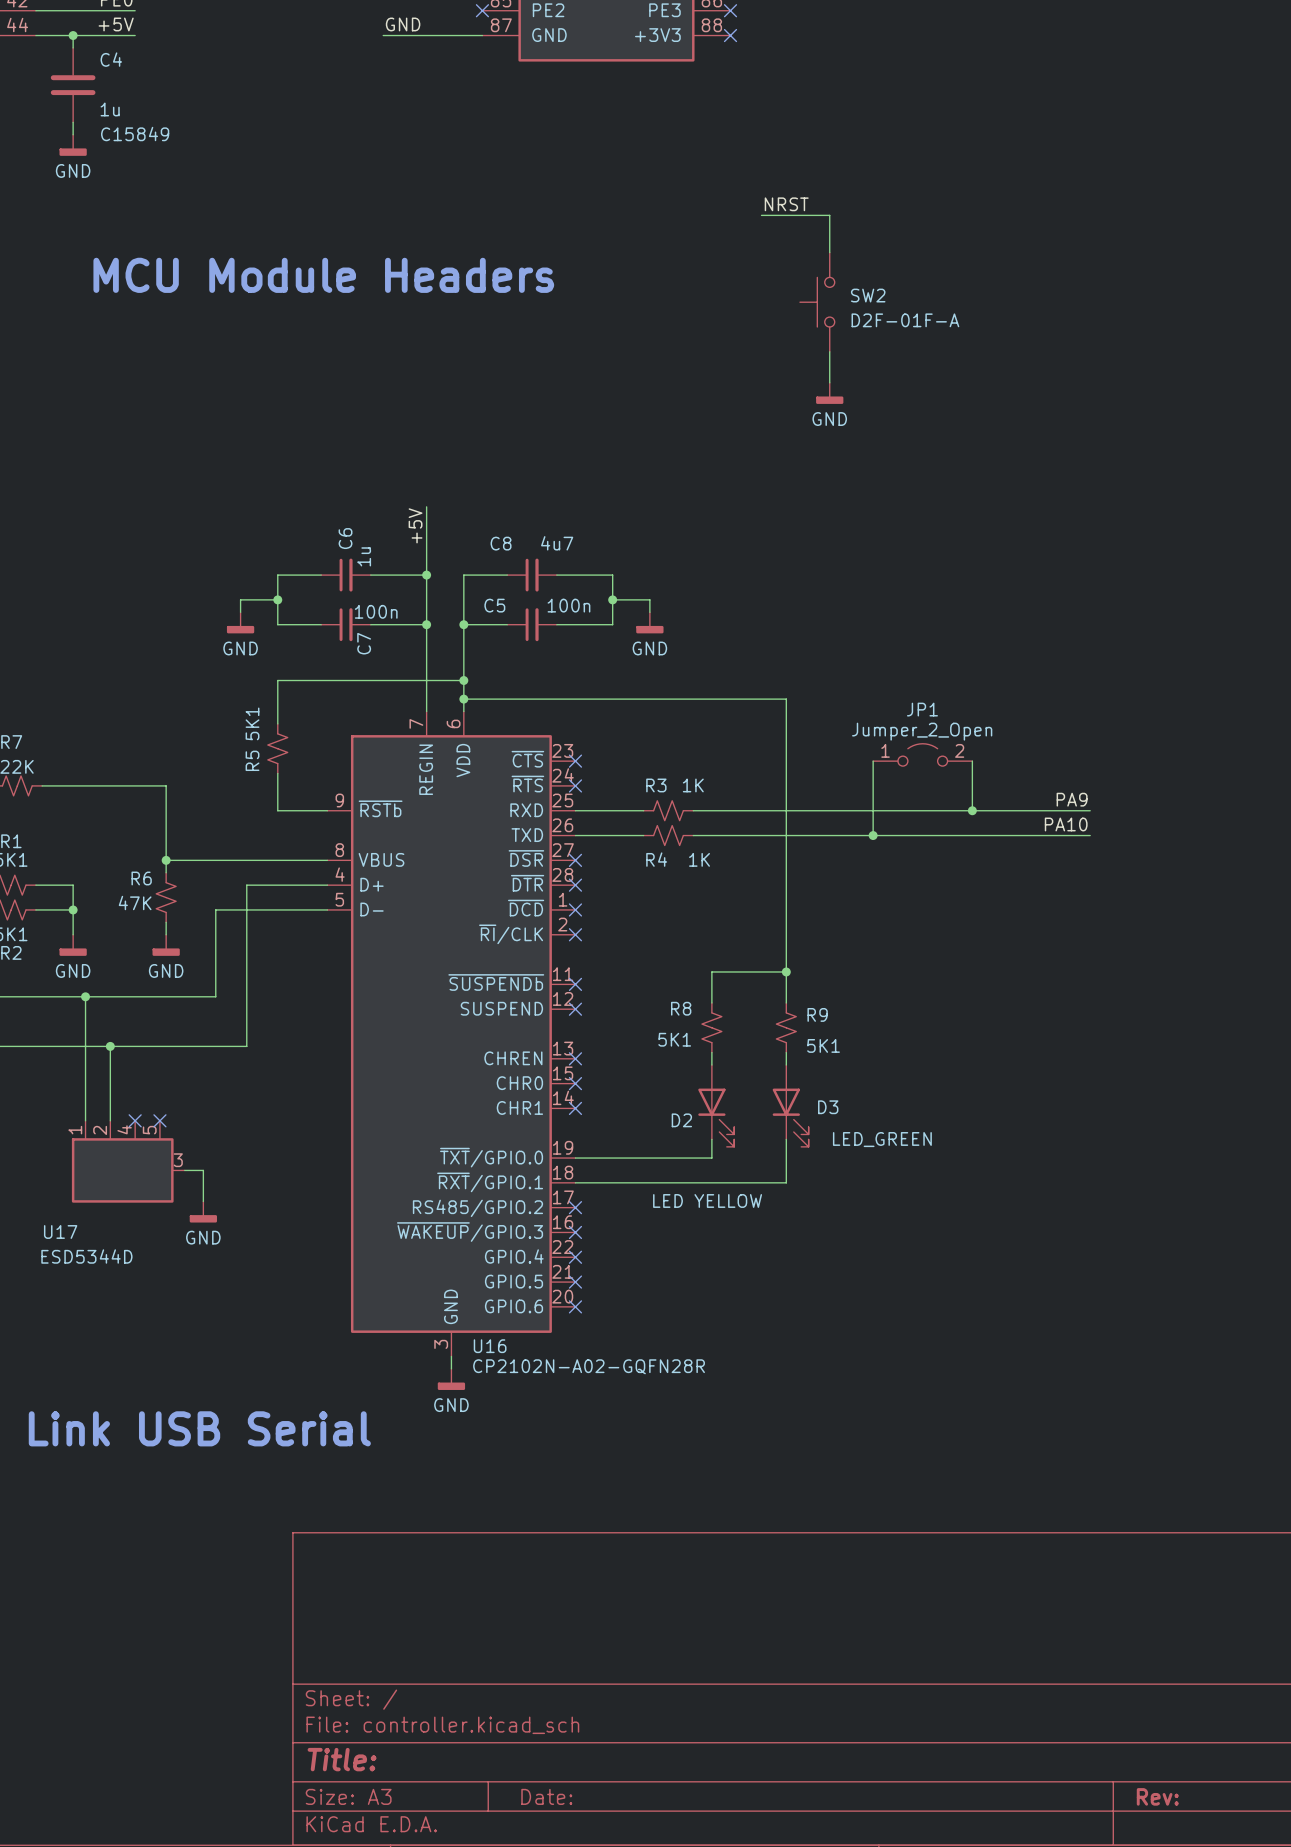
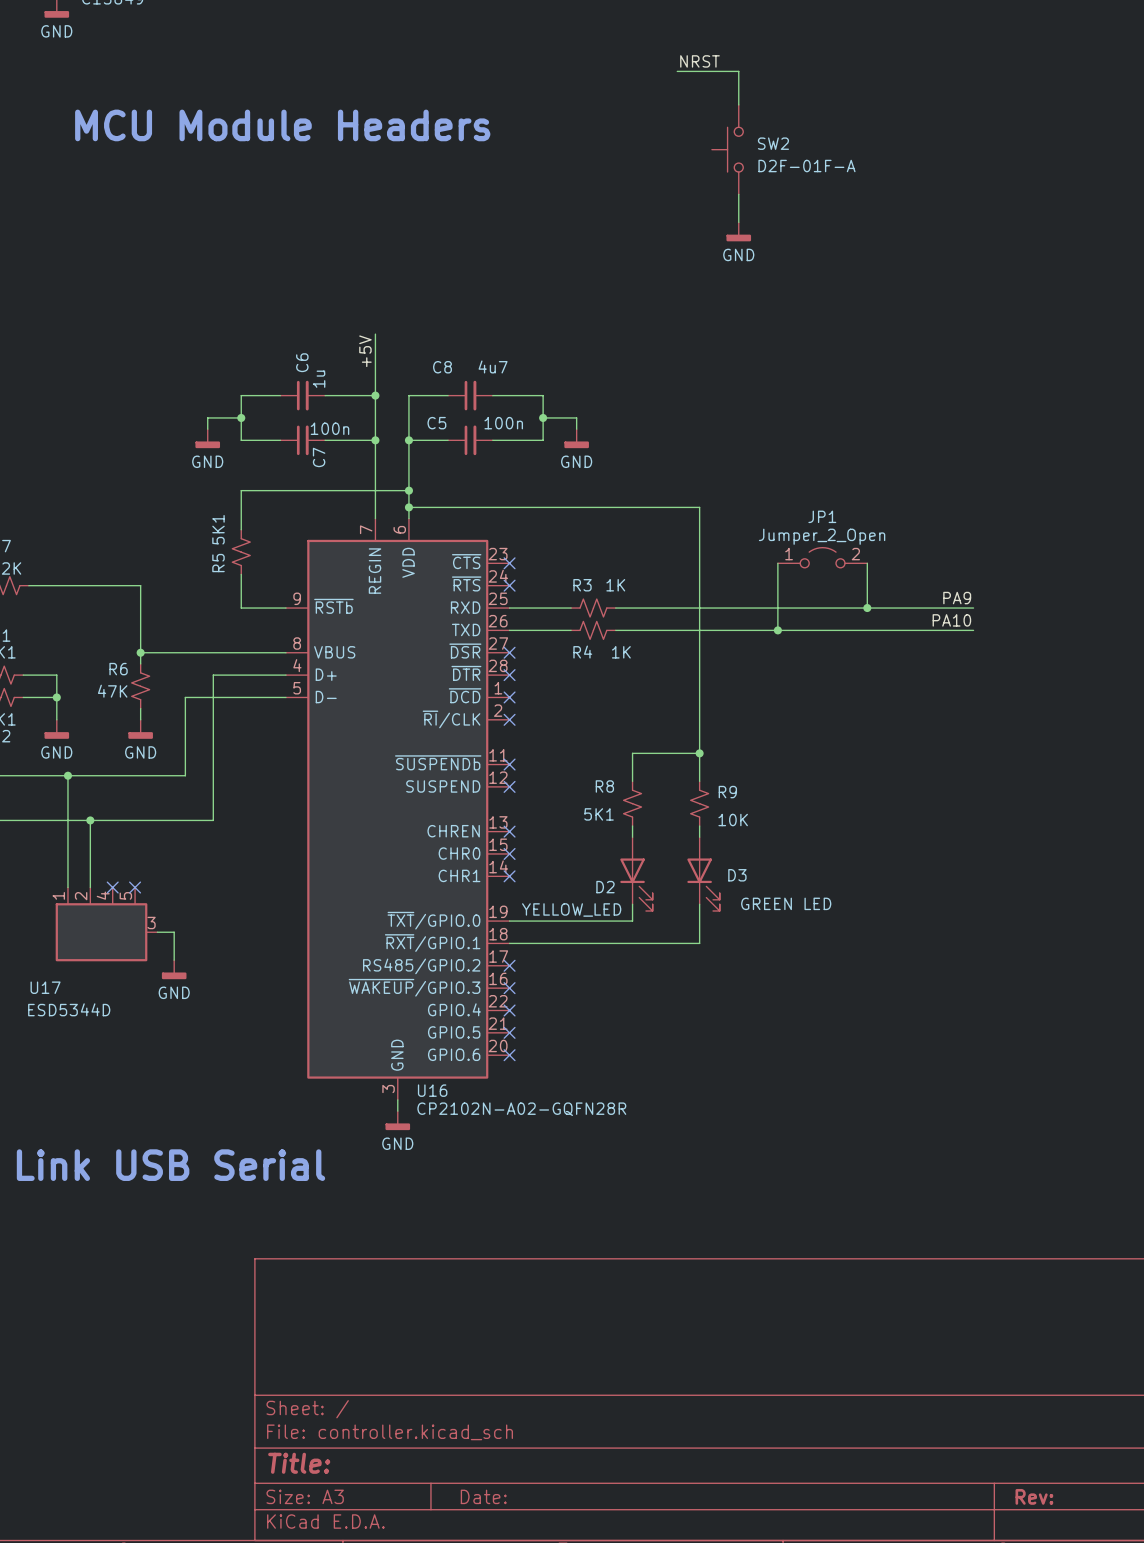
R9 value: 5K1 (823, 1045) -> 10K (733, 820)
D3 value: LED_GREEN (882, 1139) -> GREEN LED (786, 903)
D2 value: LED YELLOW (707, 1200) -> YELLOW_LED (571, 909)

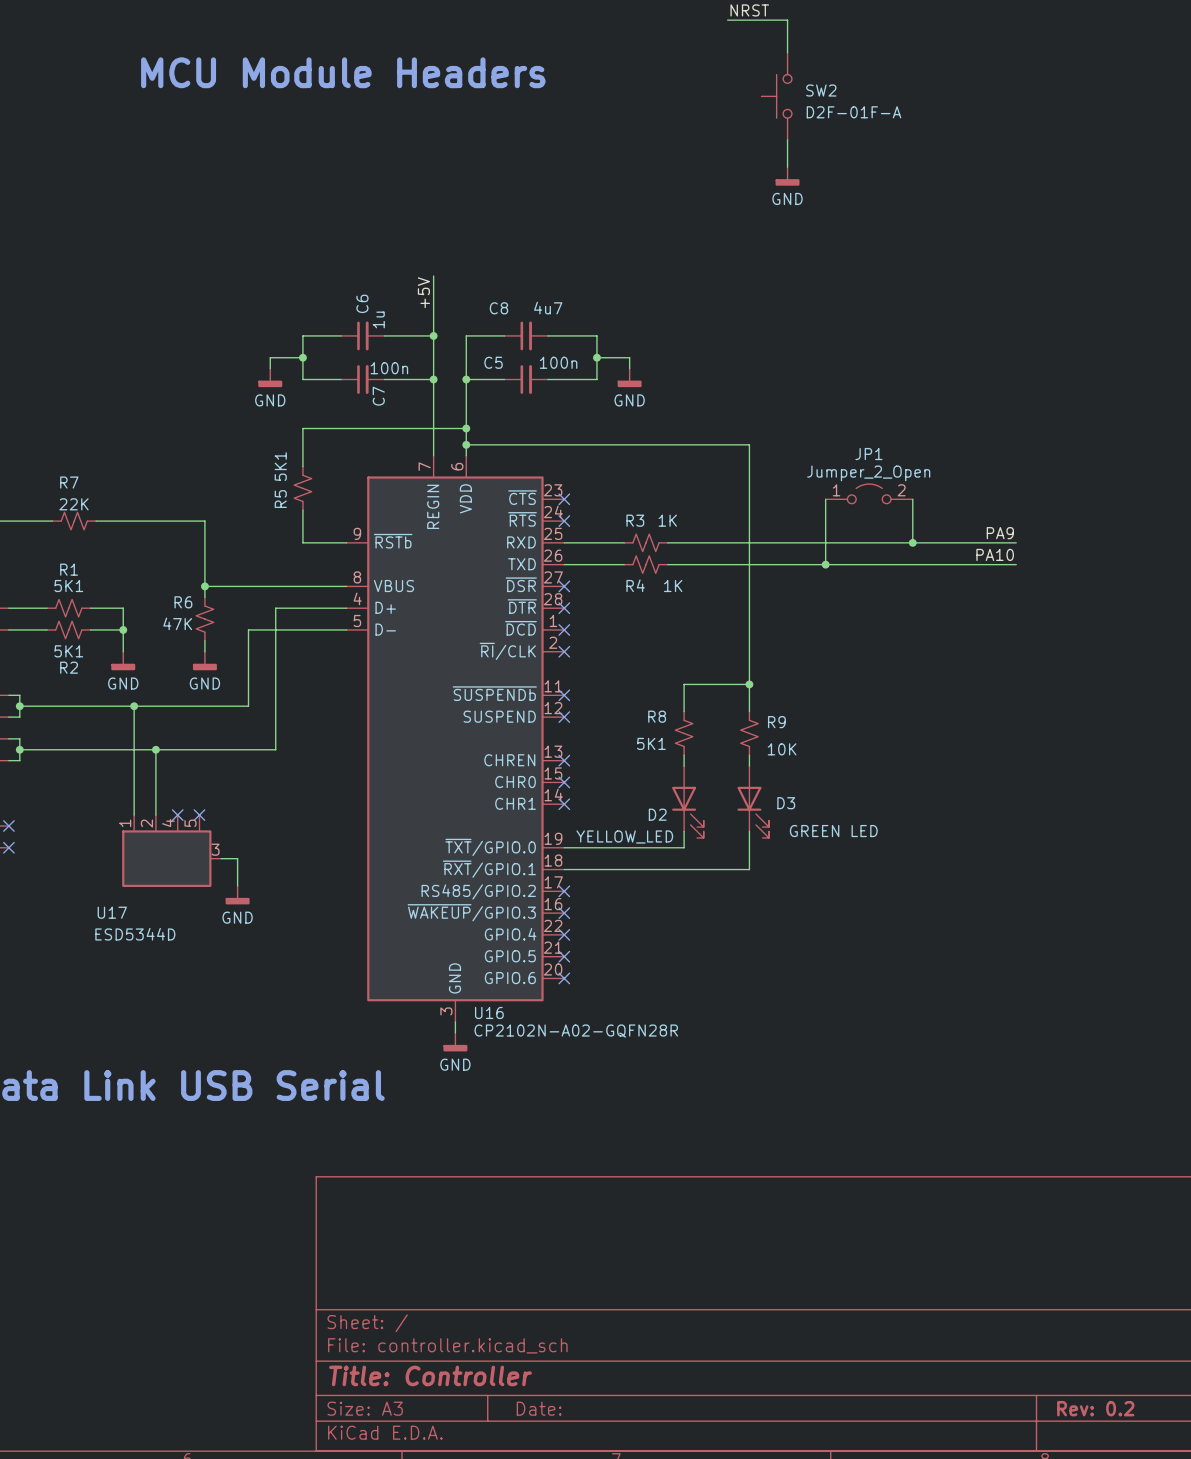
title block: Title: (299, 1463) -> Title: Controller (430, 1375)
title block: Rev: (1034, 1496) -> Rev: 0.2 (1095, 1408)

